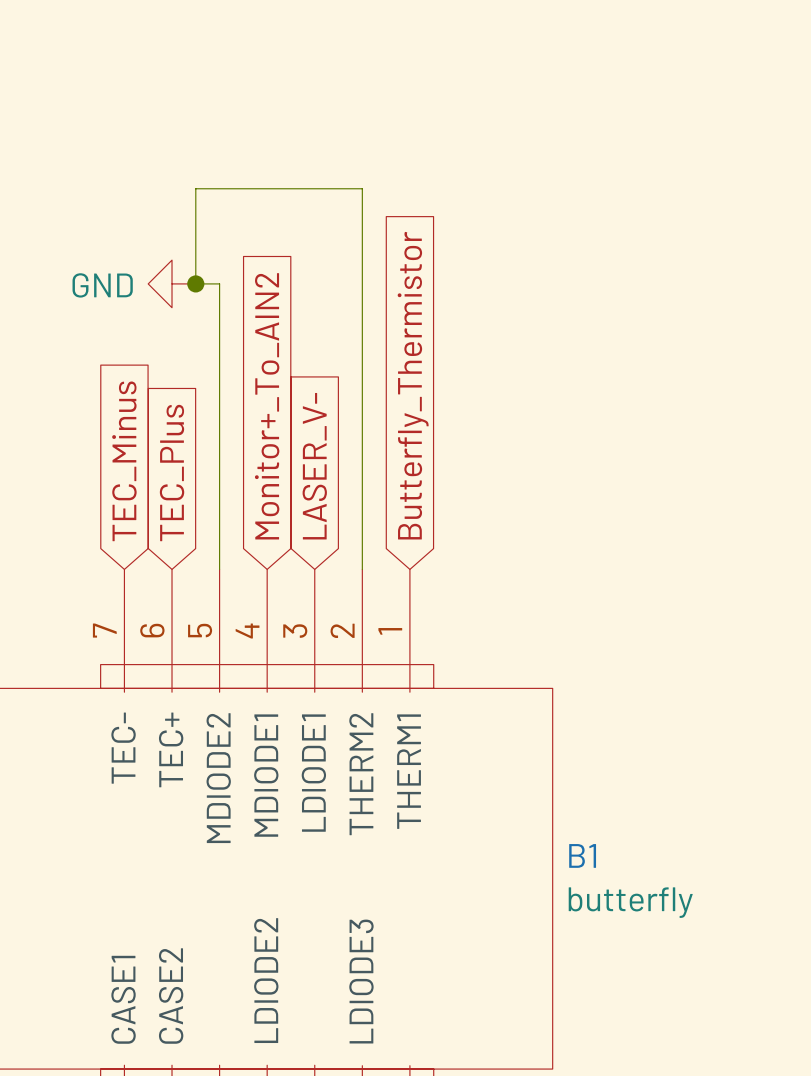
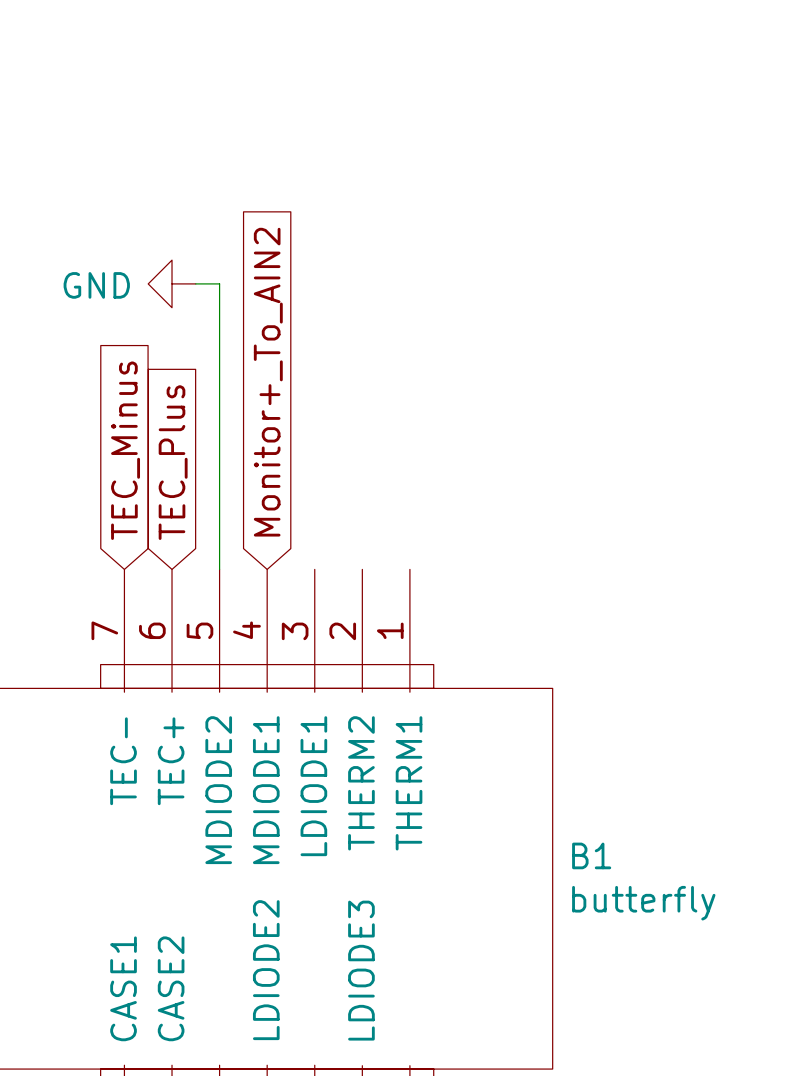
wire: (195, 283) (195, 188) (362, 188) (362, 569) -> none
junction: (195, 283) -> none
global label: Butterfly_Thermistor (413, 385) -> none
global label: LASER_V- (314, 466) -> none

